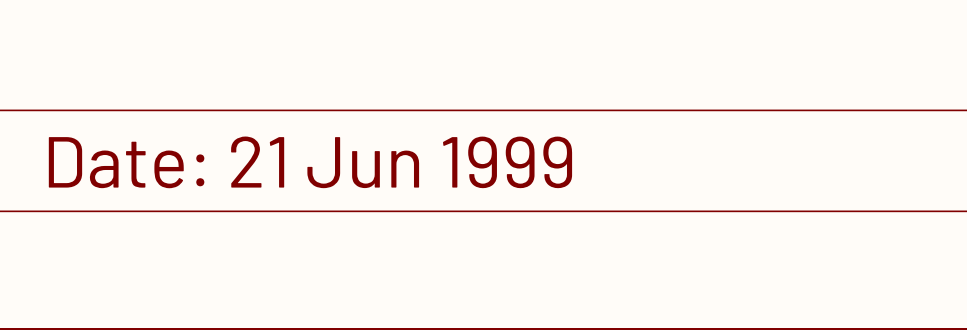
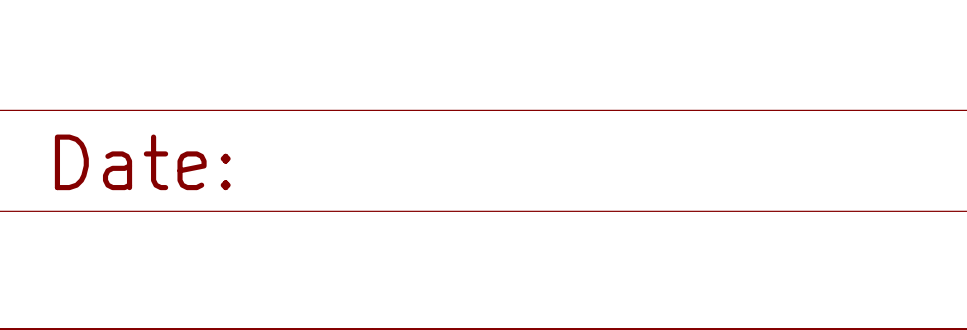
title block: Date: 21 Jun 1999 (310, 162) -> Date: (142, 162)

